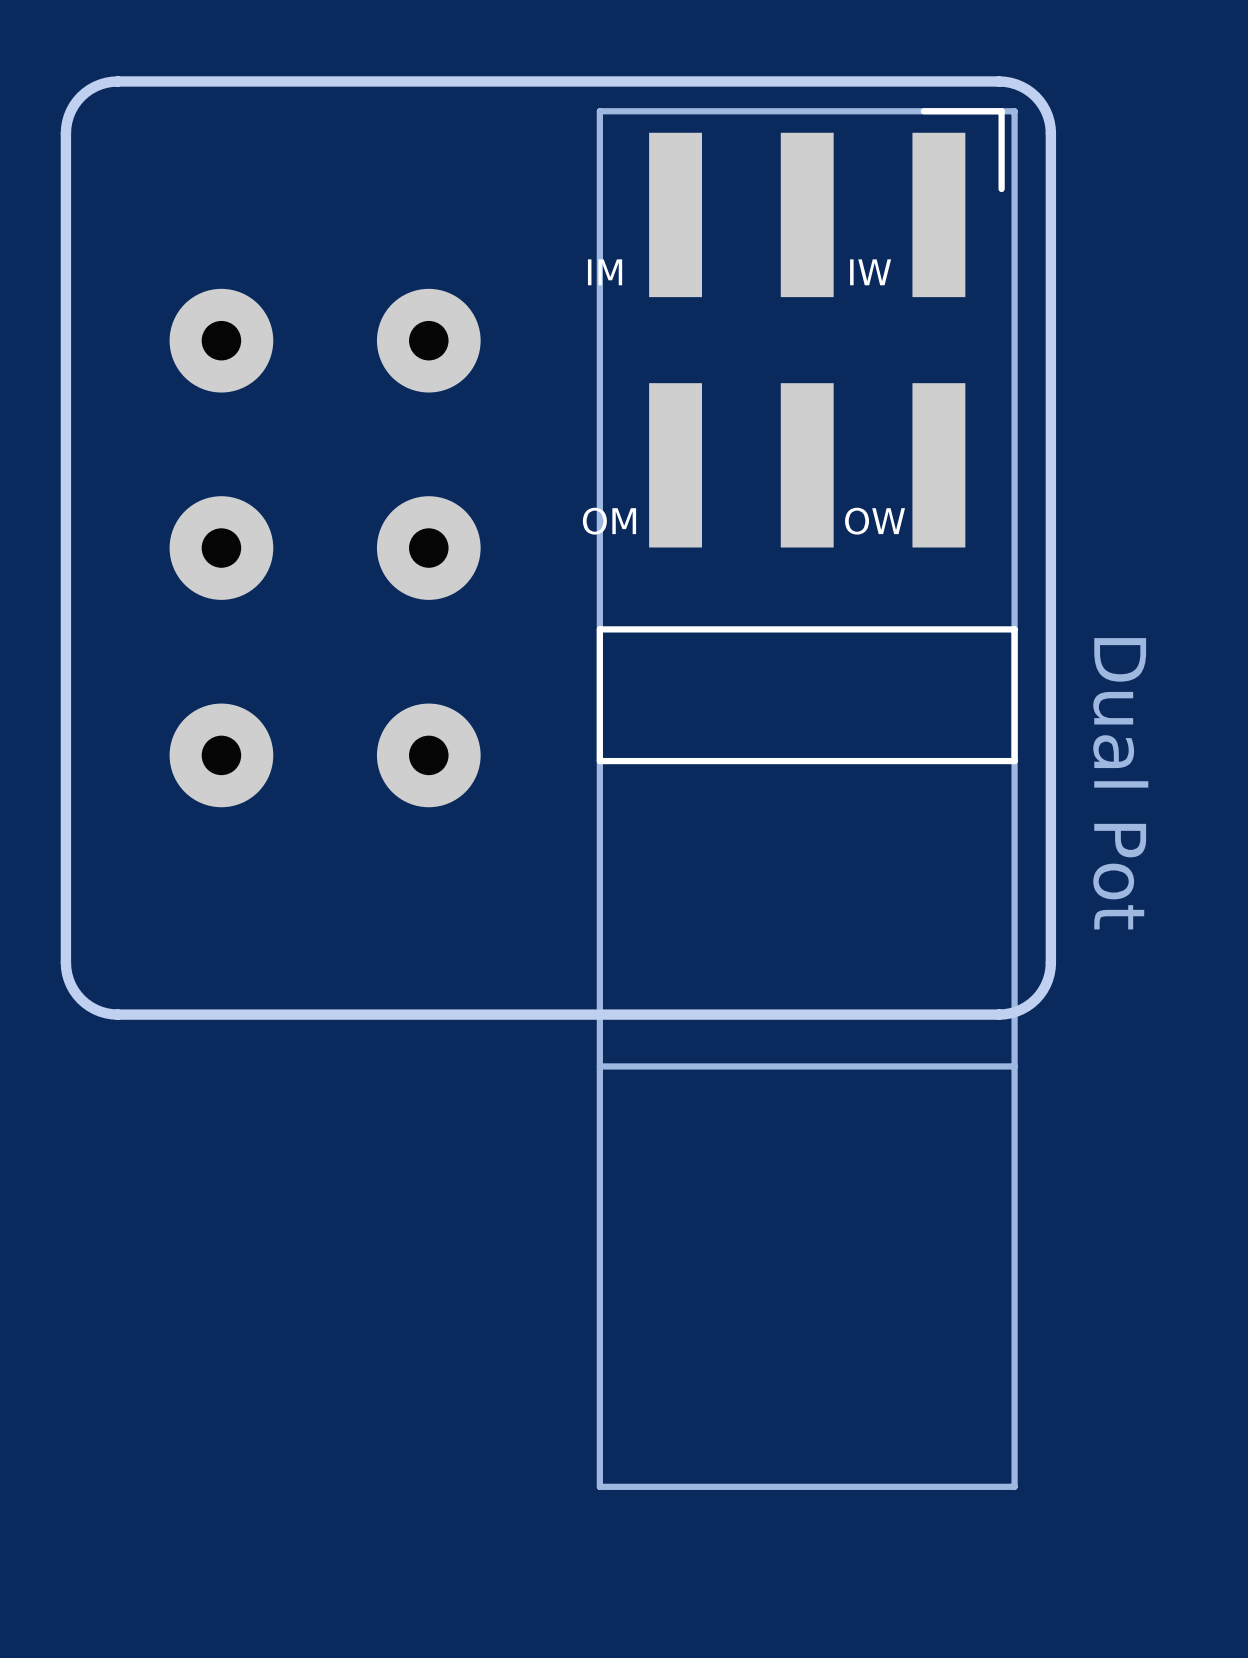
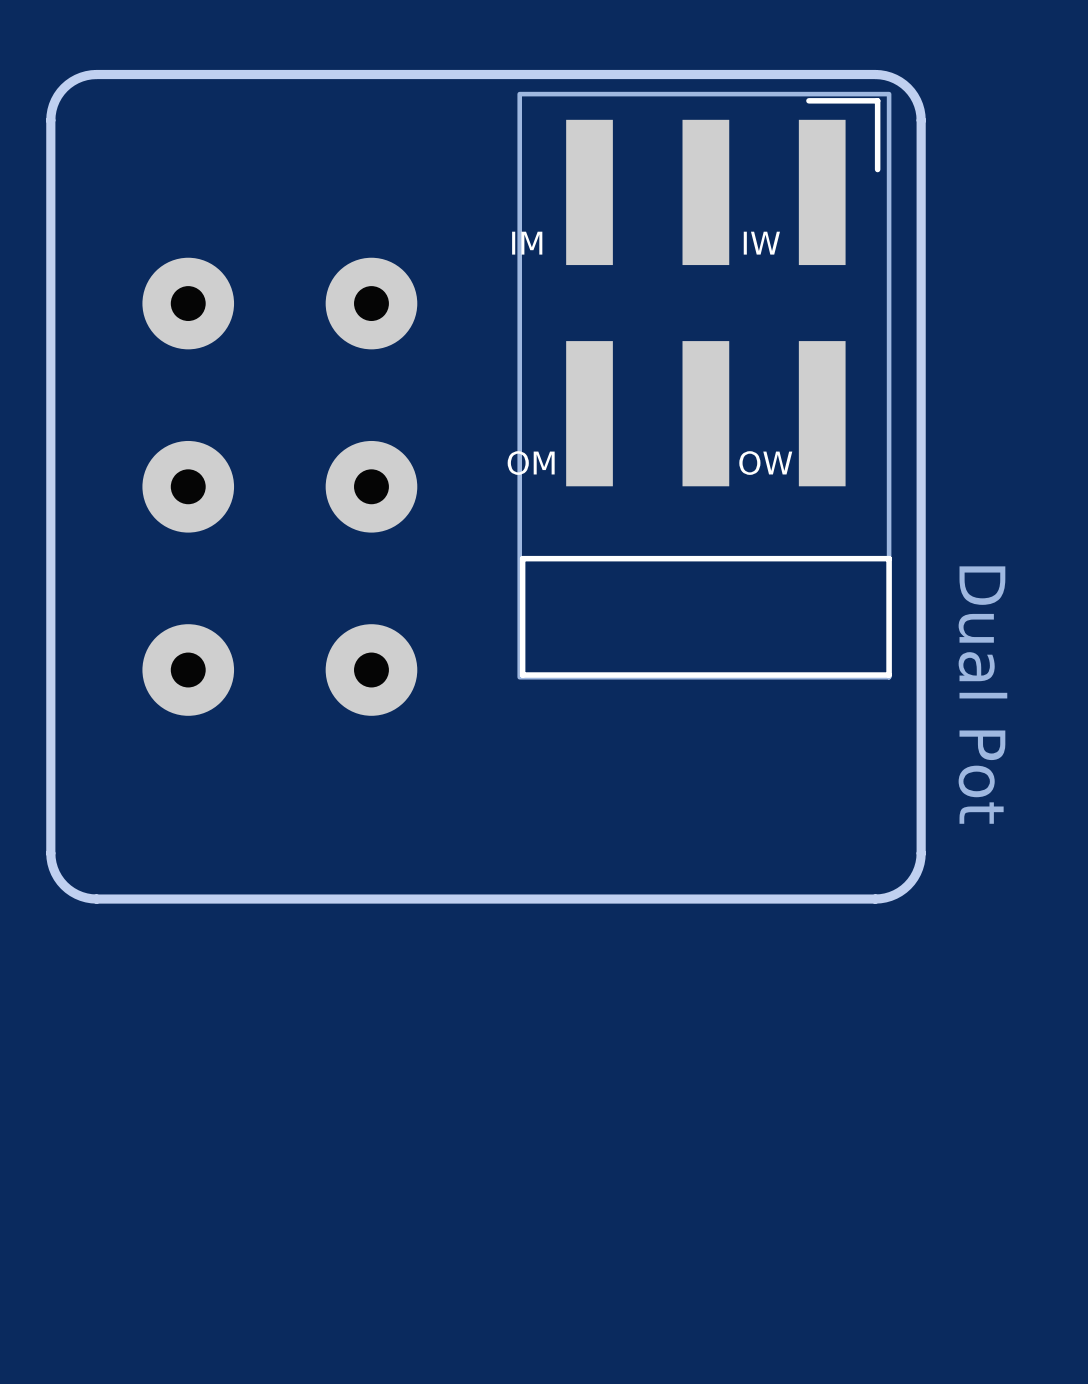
part: none -> Dual Pot (704, 385)
part: Dual Pot (807, 799) -> none

